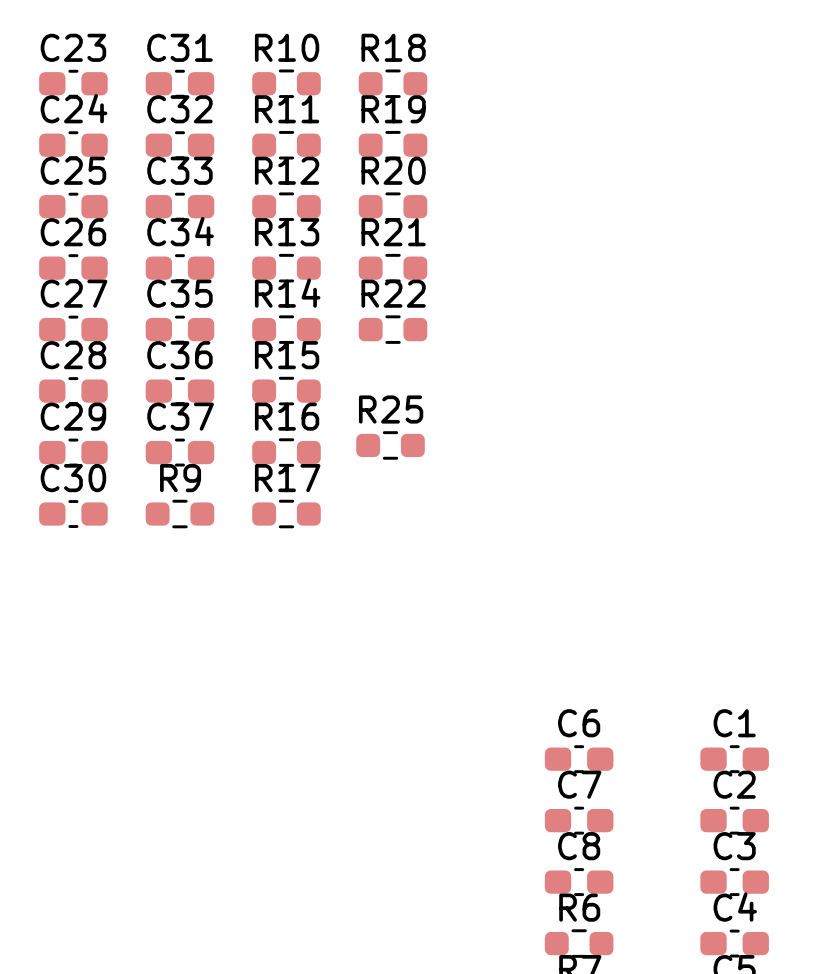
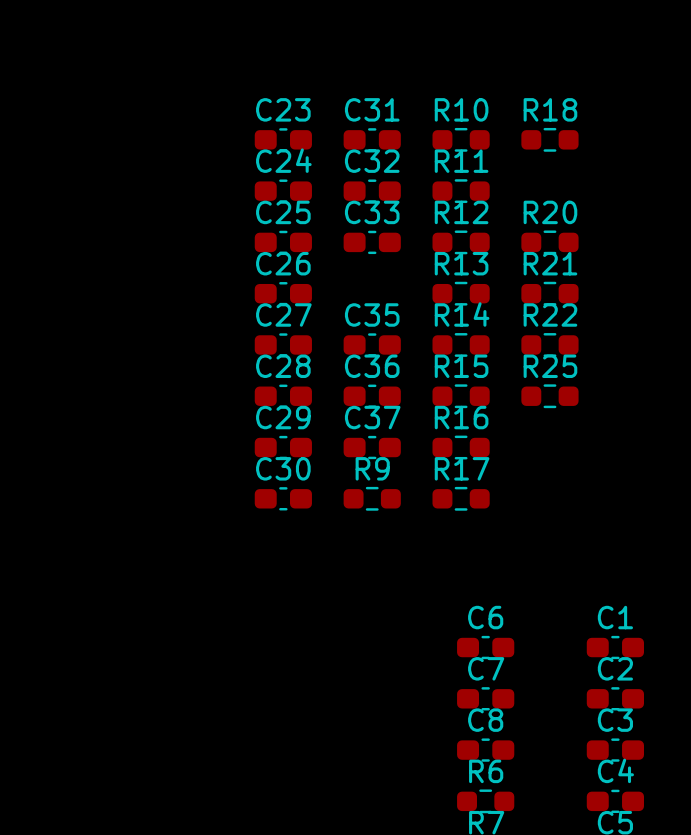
C23 position: (73, 83) -> (283, 139)
C31 position: (179, 83) -> (372, 139)
R10 position: (286, 83) -> (461, 139)
R18 position: (393, 83) -> (549, 139)
C24 position: (73, 145) -> (283, 191)
C32 position: (179, 145) -> (372, 191)
R11 position: (286, 145) -> (461, 191)
R19: (393, 145) -> none
C25 position: (73, 206) -> (283, 242)
C33 position: (179, 206) -> (372, 242)
R12 position: (286, 206) -> (461, 242)
R20 position: (393, 206) -> (549, 242)
C26 position: (73, 268) -> (283, 293)
C34: (179, 268) -> none
R13 position: (286, 268) -> (461, 293)
R21 position: (393, 268) -> (549, 293)
C27 position: (73, 329) -> (283, 344)
C35 position: (179, 329) -> (372, 344)
R14 position: (286, 329) -> (461, 344)
R22 position: (393, 329) -> (549, 344)
C28 position: (73, 391) -> (283, 396)
C36 position: (179, 391) -> (372, 396)
R15 position: (286, 391) -> (461, 396)
R25 position: (390, 445) -> (549, 396)
C29 position: (73, 452) -> (283, 447)
C37 position: (179, 452) -> (372, 447)
R16 position: (286, 452) -> (461, 447)
C30 position: (73, 514) -> (283, 498)
R9 position: (179, 514) -> (372, 498)
R17 position: (286, 514) -> (461, 498)

